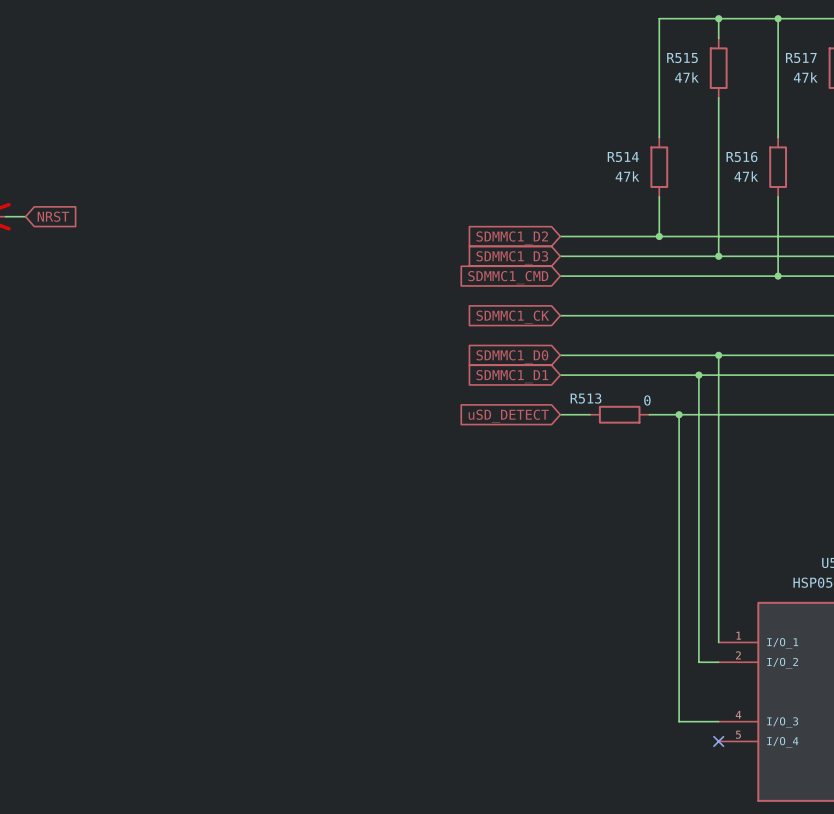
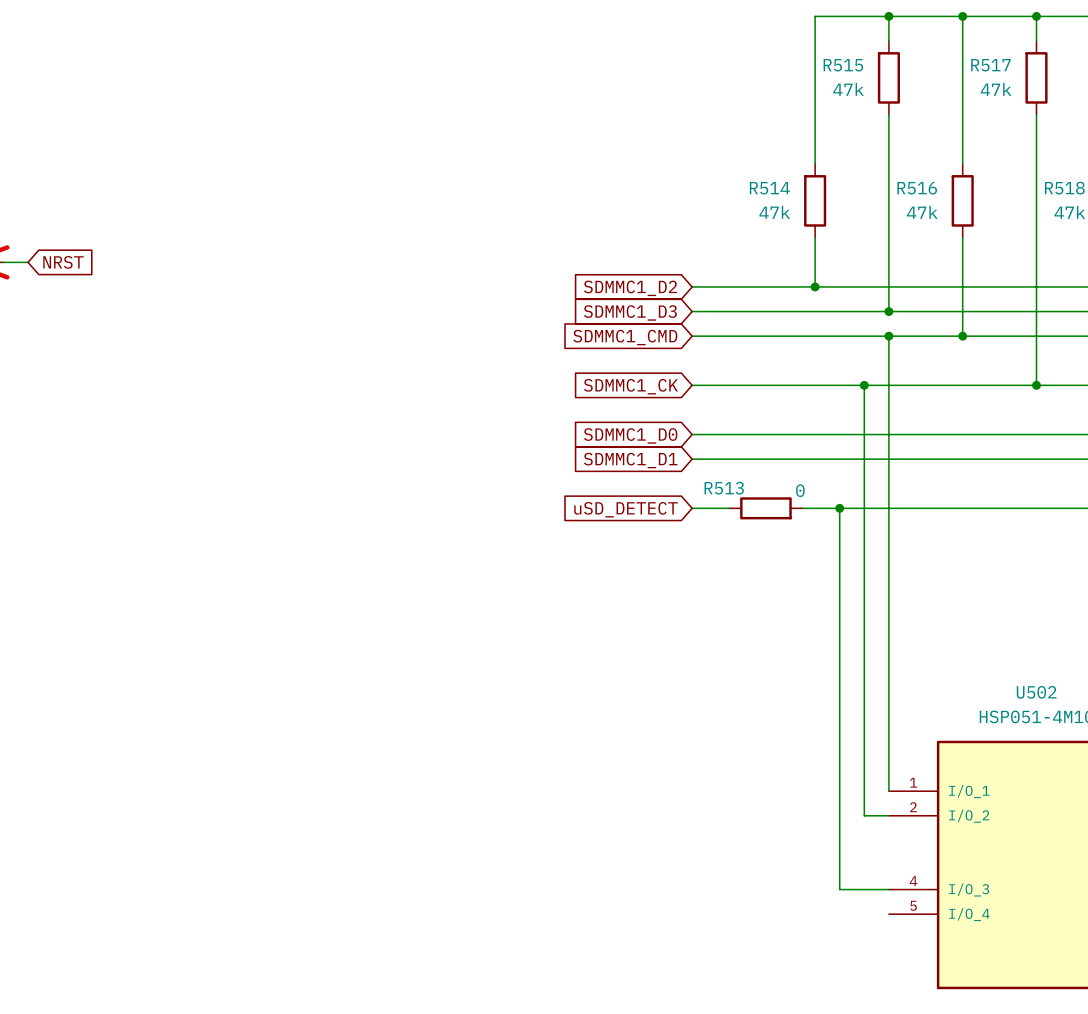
wire: none -> (888, 336) (888, 434)
junction: none -> (888, 336)
wire: none -> (864, 385) (864, 459)
junction: none -> (864, 385)
junction: (718, 355) -> none
junction: (698, 375) -> none
no-connect mark: (718, 741) -> none

